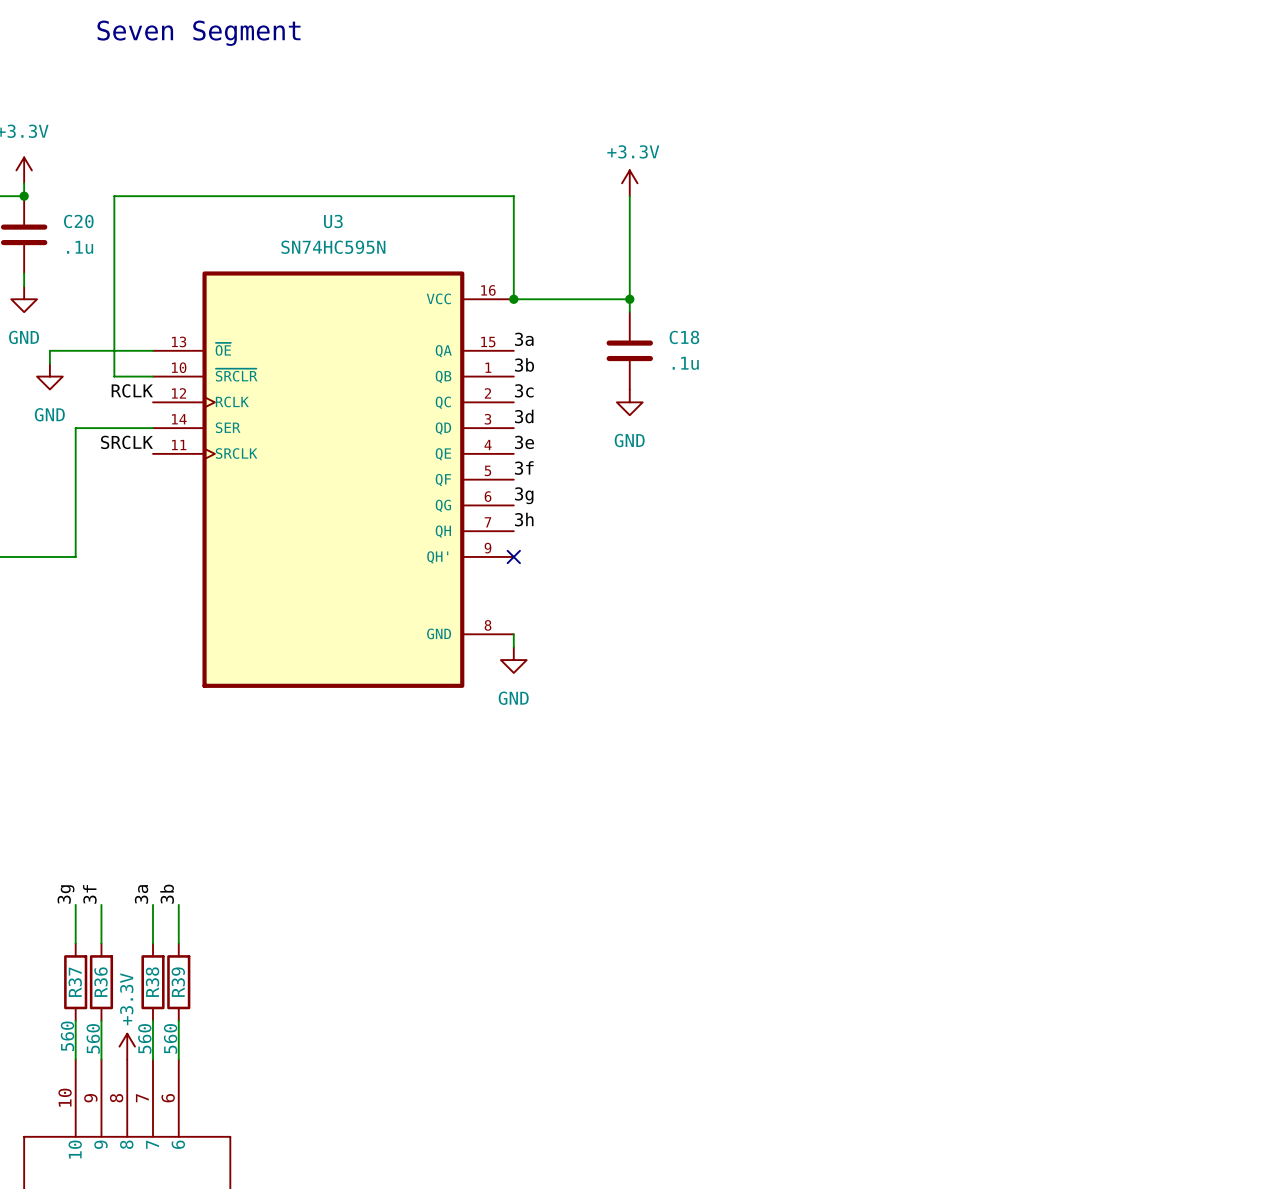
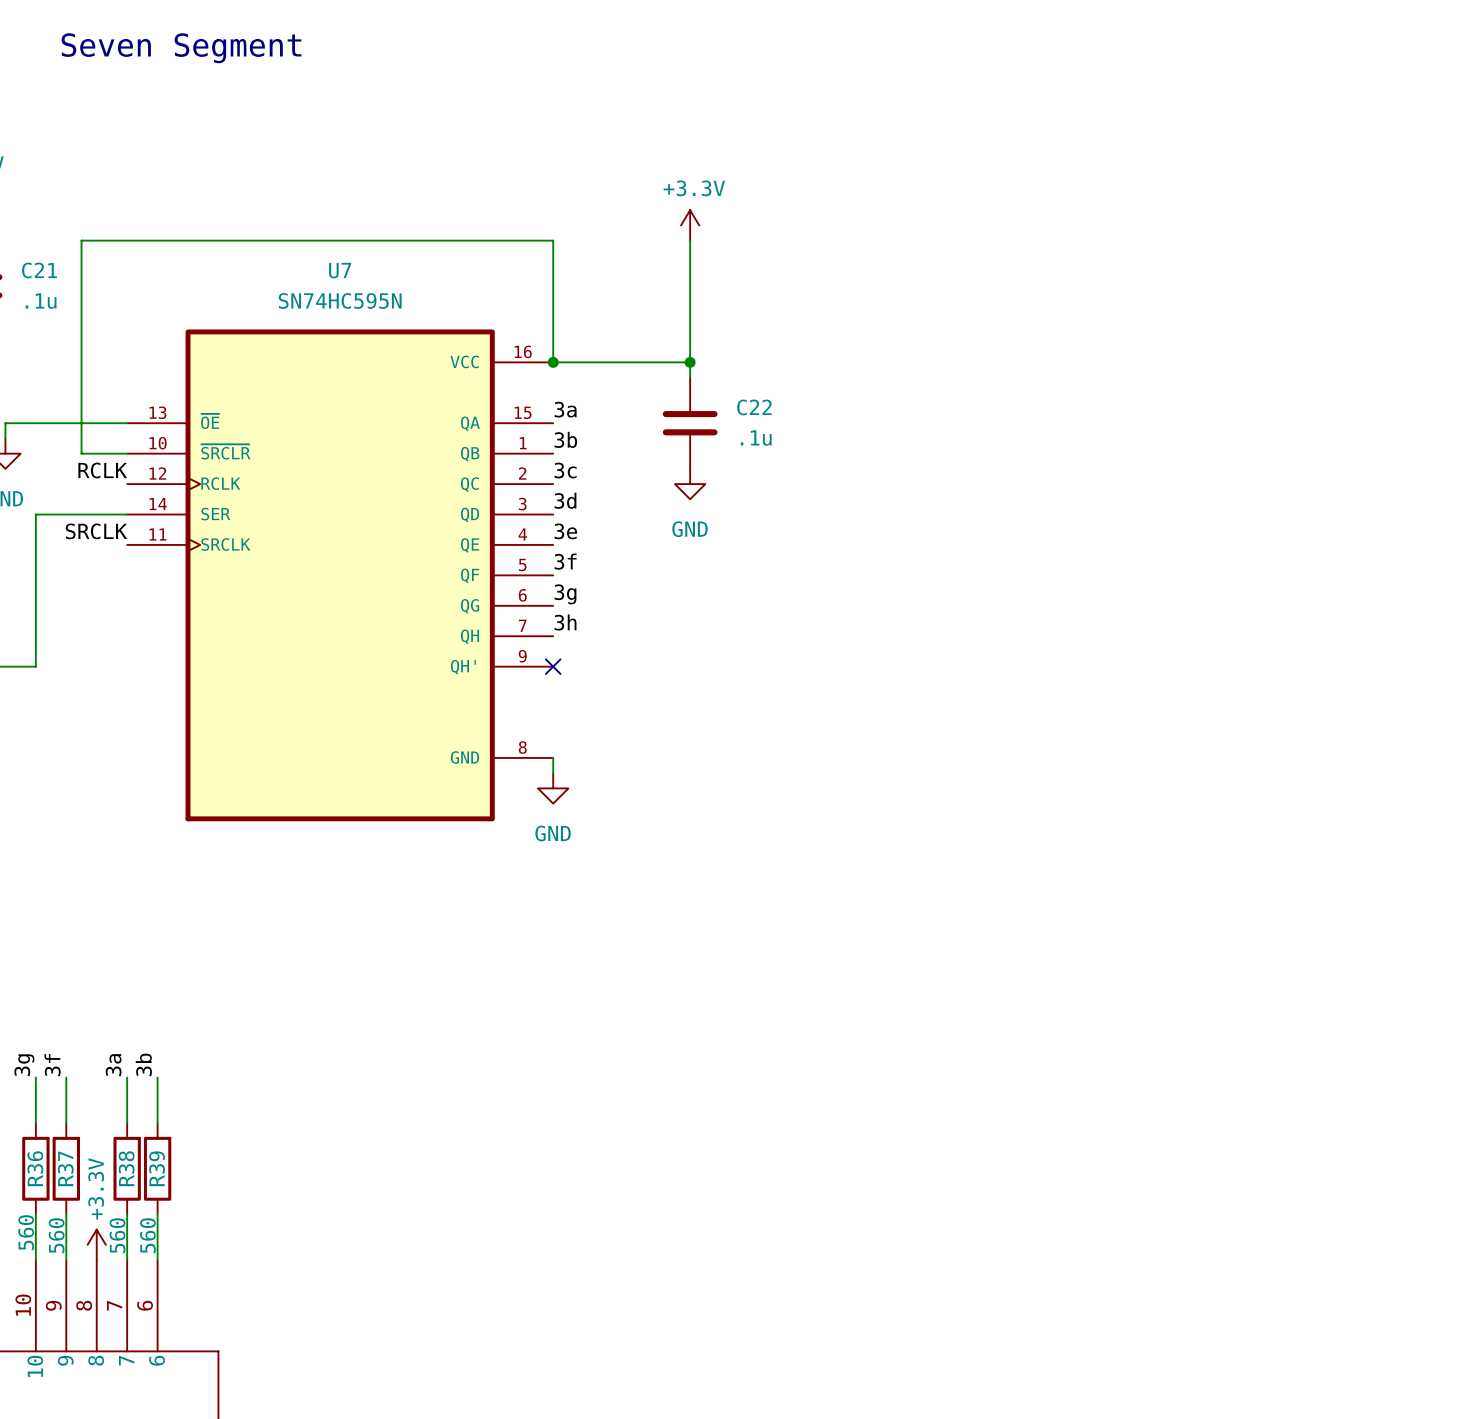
C20 name: C20 (78, 221) -> C21 (39, 270)
U3 name: U3 (333, 221) -> U7 (340, 270)
C18 name: C18 (684, 337) -> C22 (754, 407)
R37 name: R37 (75, 982) -> R36 (35, 1168)
R36 name: R36 (100, 982) -> R37 (65, 1168)

